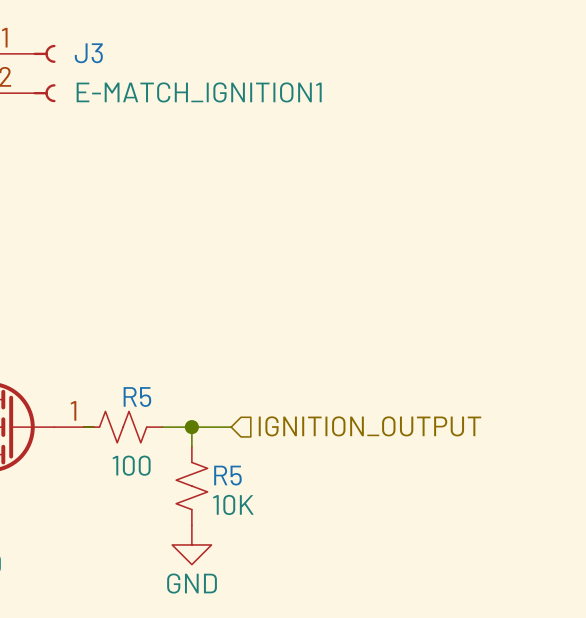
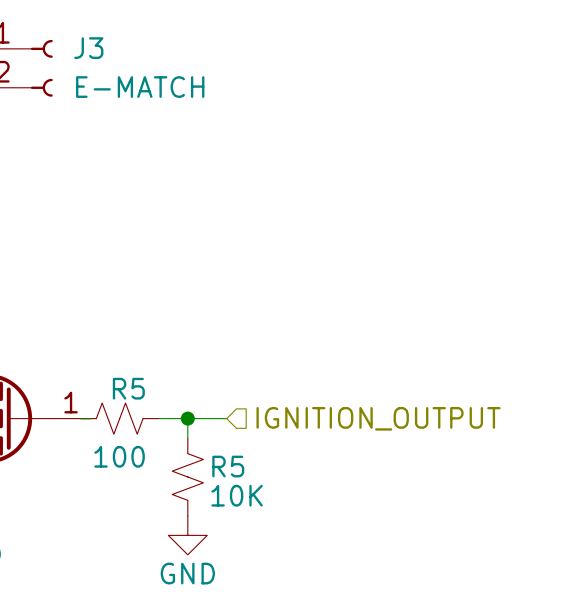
J3 value: E-MATCH_IGNITION1 (199, 92) -> E-MATCH (140, 87)

